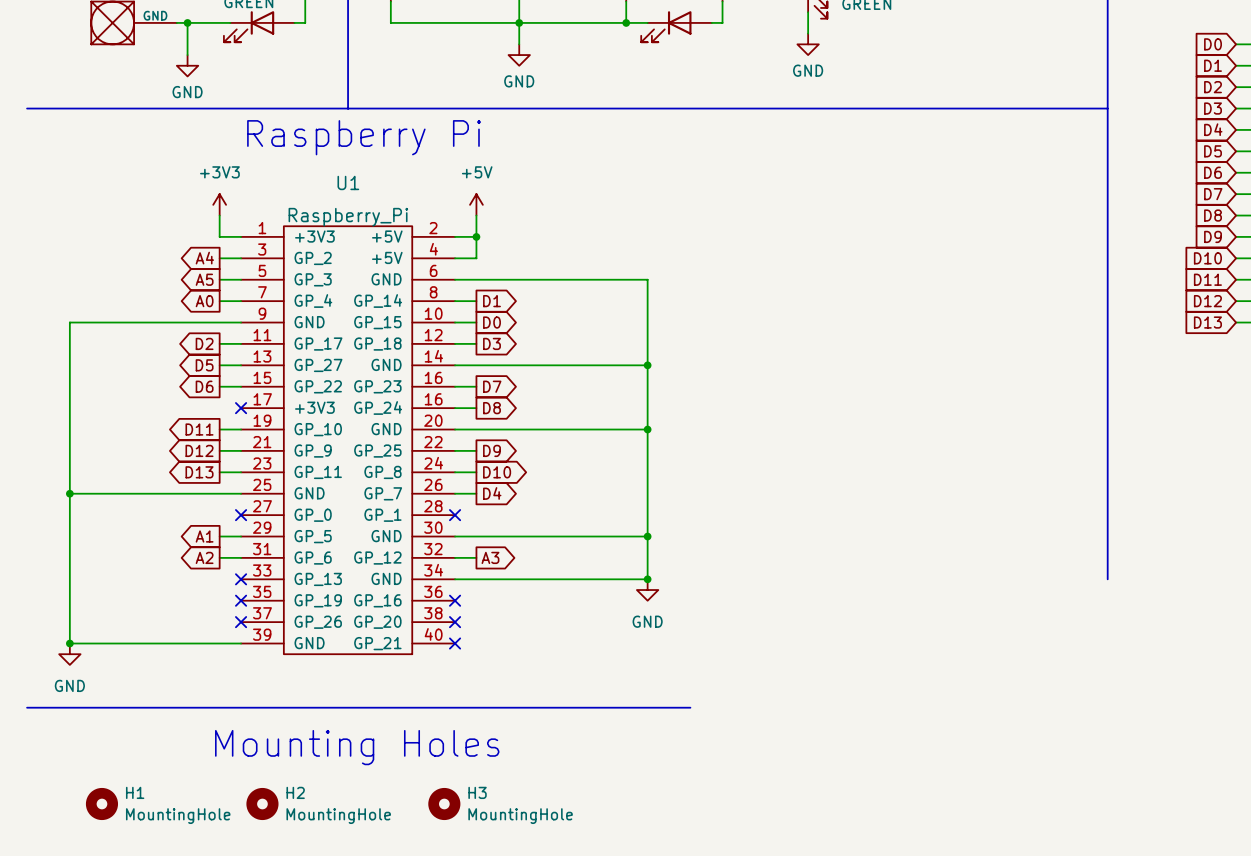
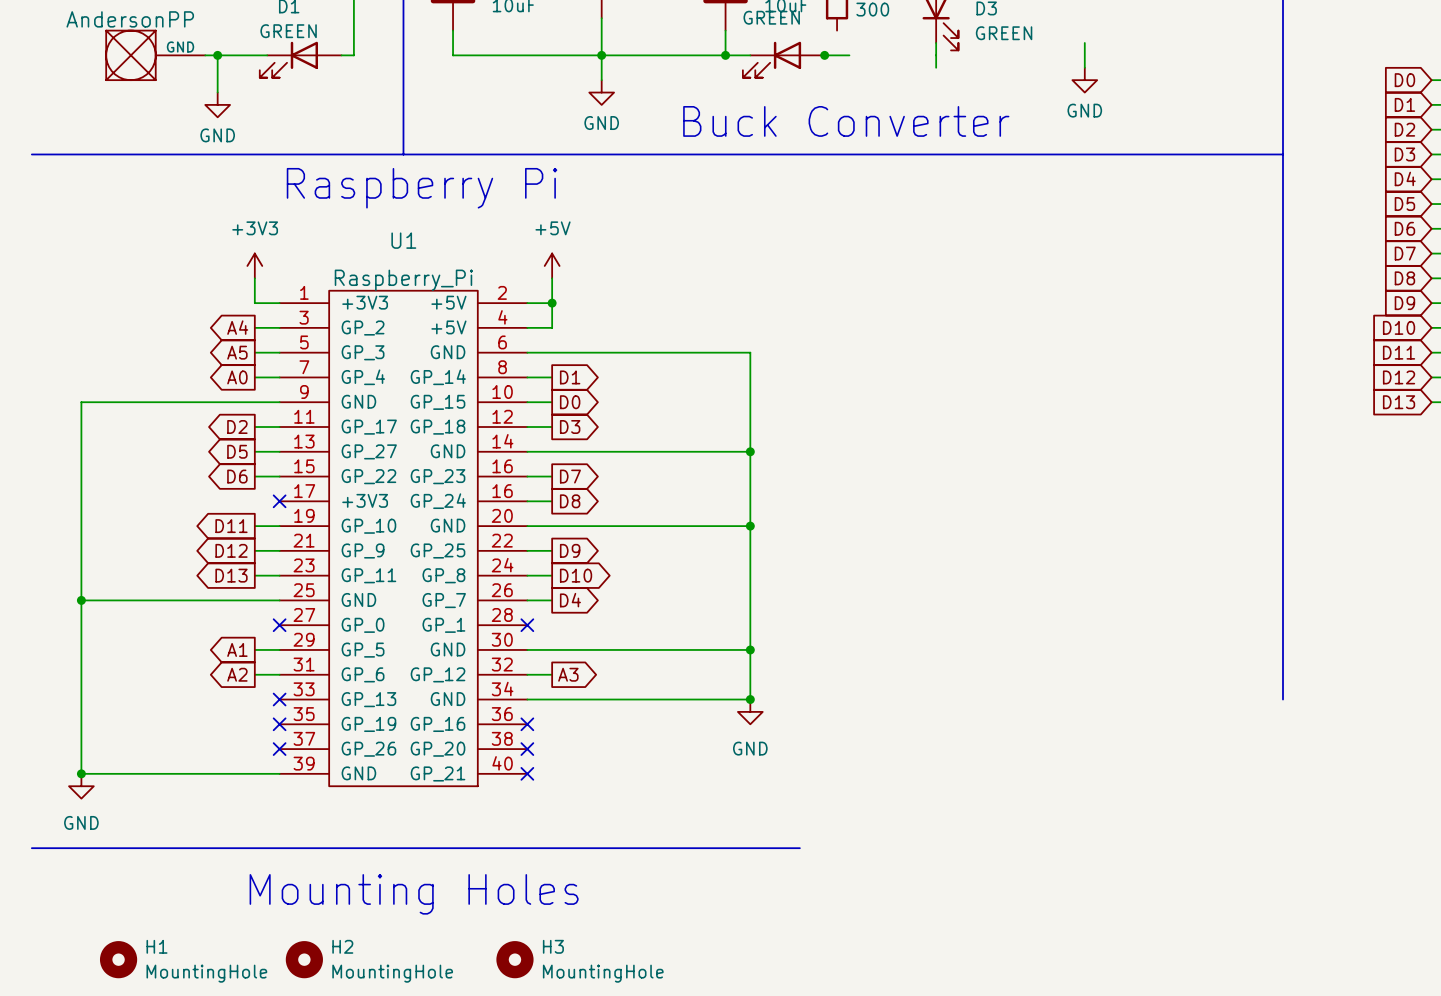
wire: (722, 1) (722, 22) -> (849, 55) (837, 55)
wire: none -> (1084, 42) (1084, 67)
junction: none -> (824, 55)
power symbol position: GND (808, 44) -> GND (1084, 80)
text: none -> Buck Converter (846, 121)

